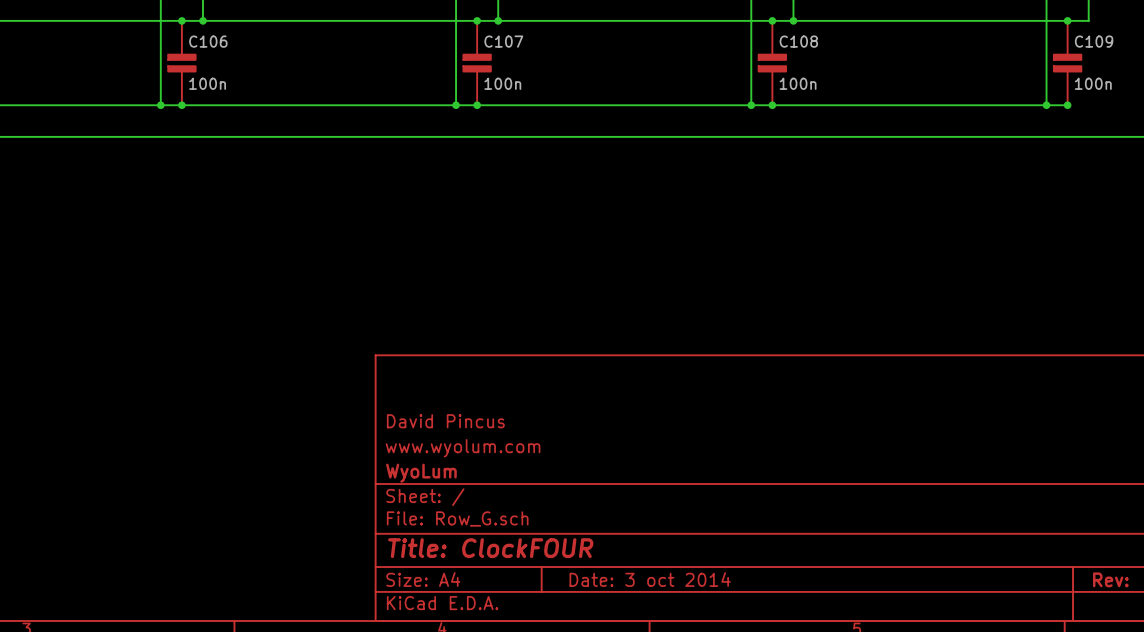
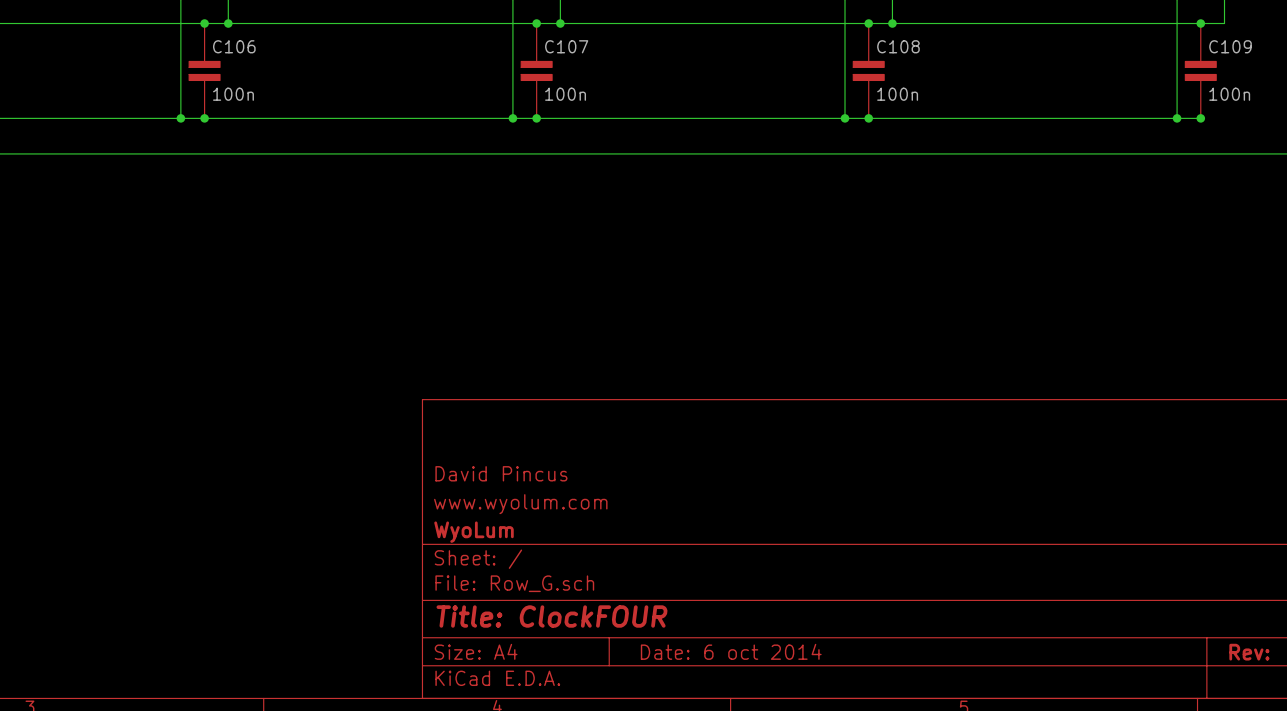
title block: Date: 3 oct 2014 (650, 579) -> Date: 6 oct 2014 (731, 651)

